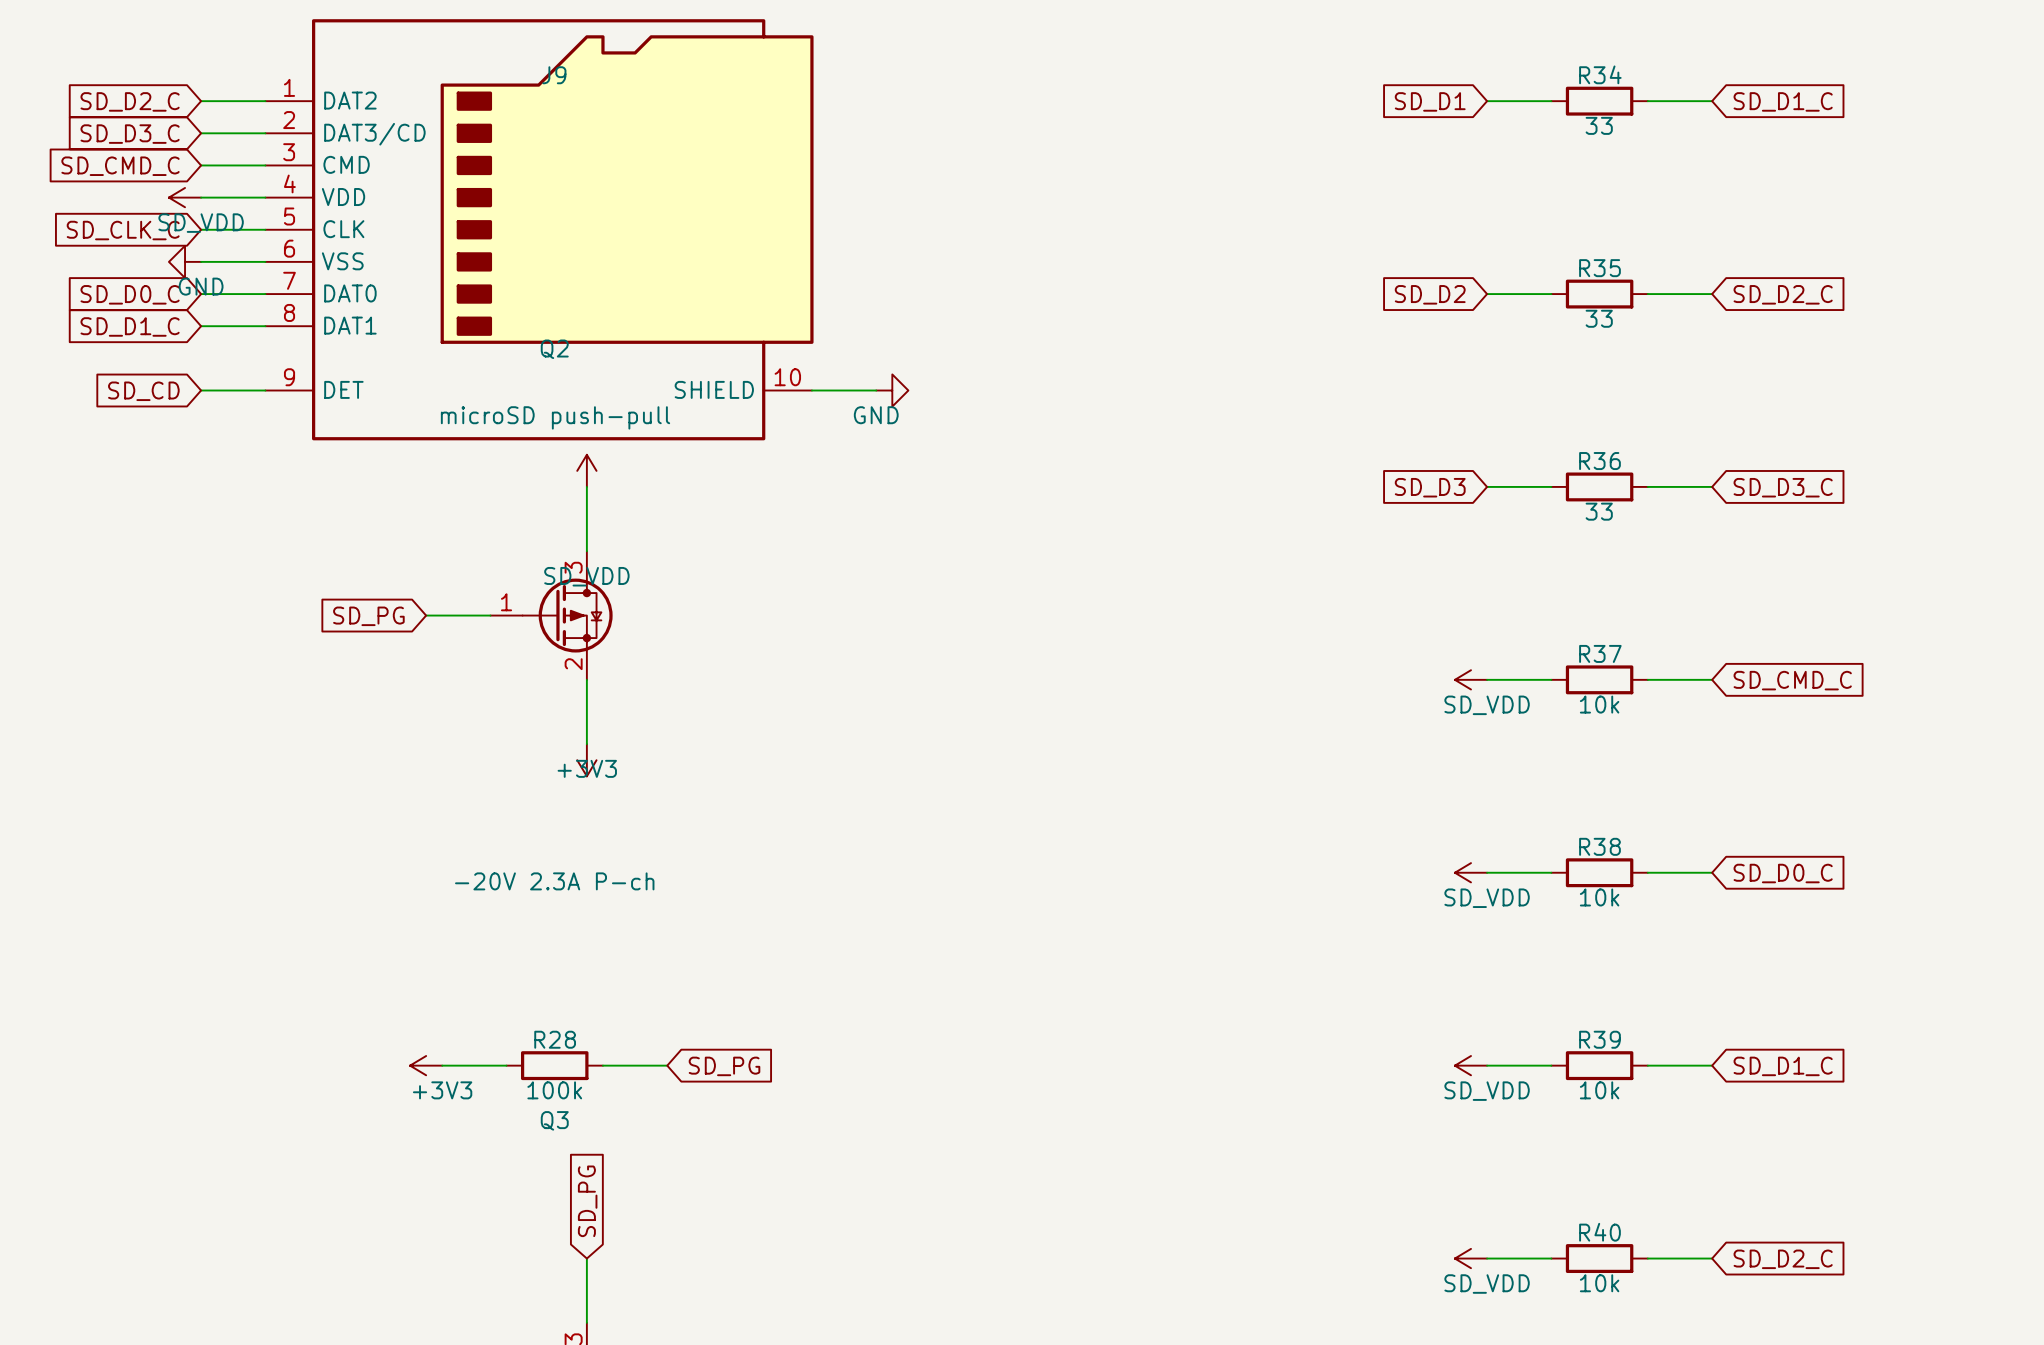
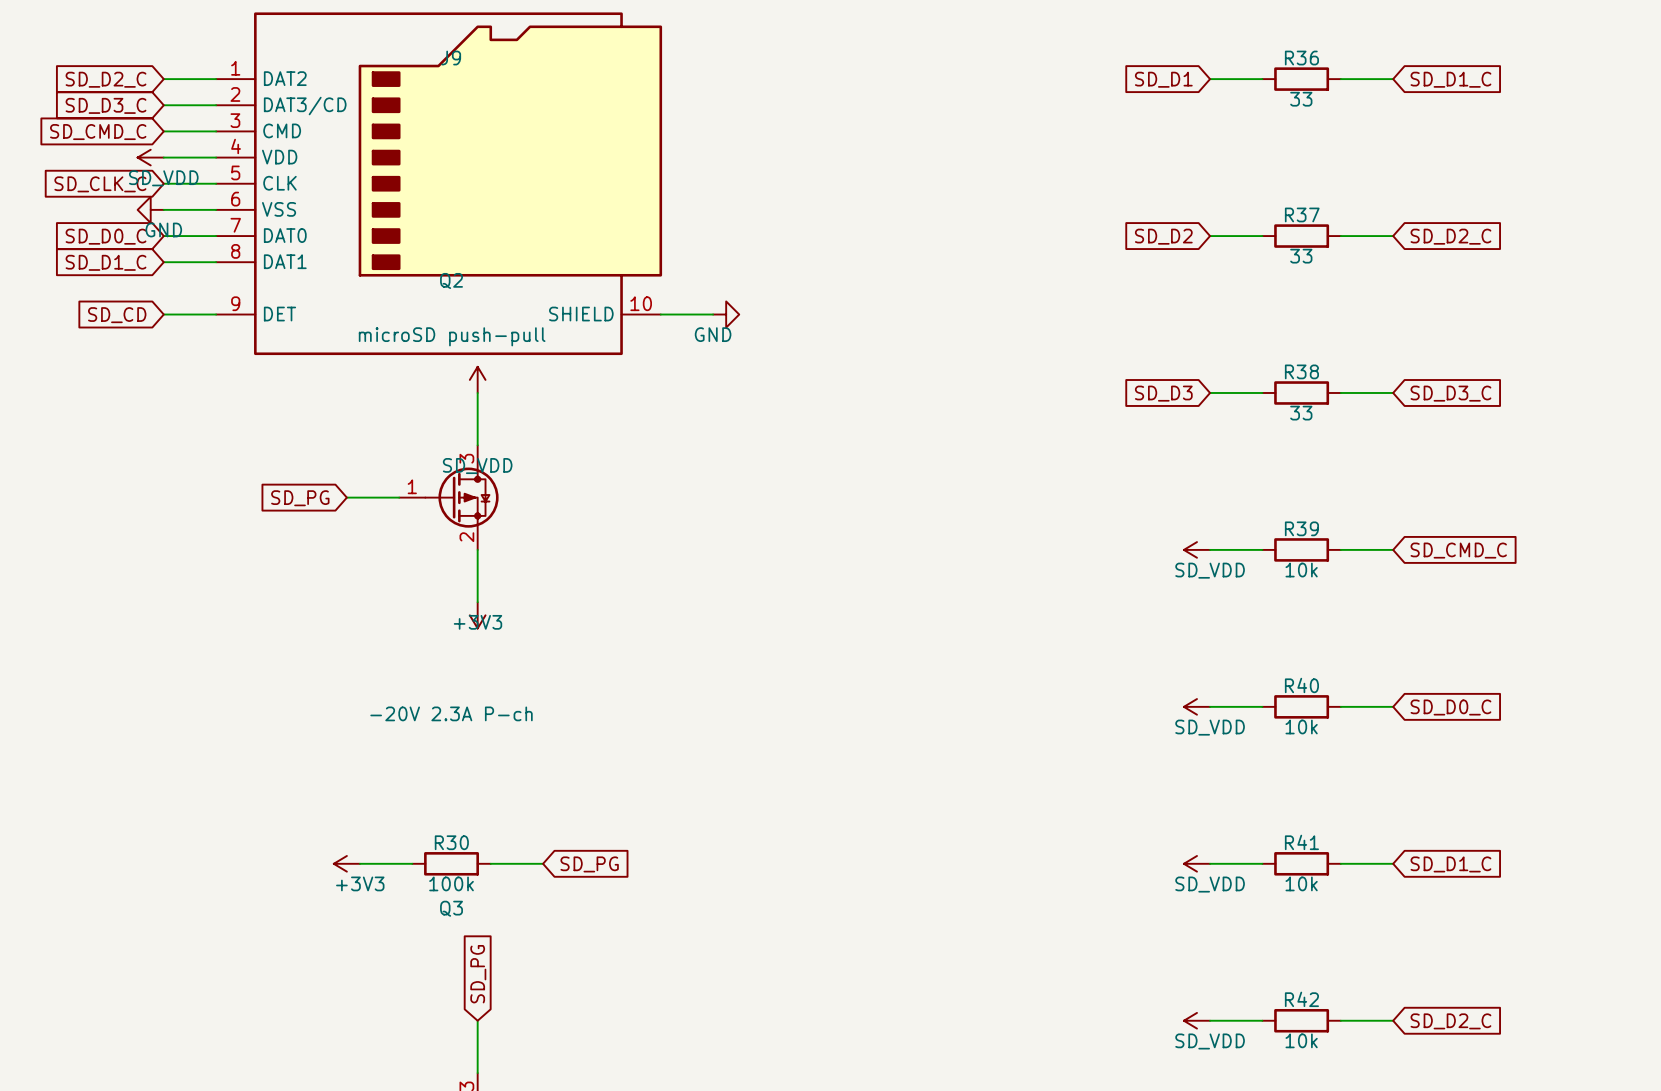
R34 name: R34 (1600, 74) -> R36 (1301, 58)
R35 name: R35 (1599, 268) -> R37 (1302, 214)
R36 name: R36 (1599, 461) -> R38 (1301, 371)
R37 name: R37 (1600, 653) -> R39 (1301, 528)
R38 name: R38 (1599, 846) -> R40 (1301, 685)
R28 name: R28 (555, 1039) -> R30 (451, 842)
R39 name: R39 (1599, 1039) -> R41 (1301, 842)
R40 name: R40 (1599, 1232) -> R42 (1301, 999)

